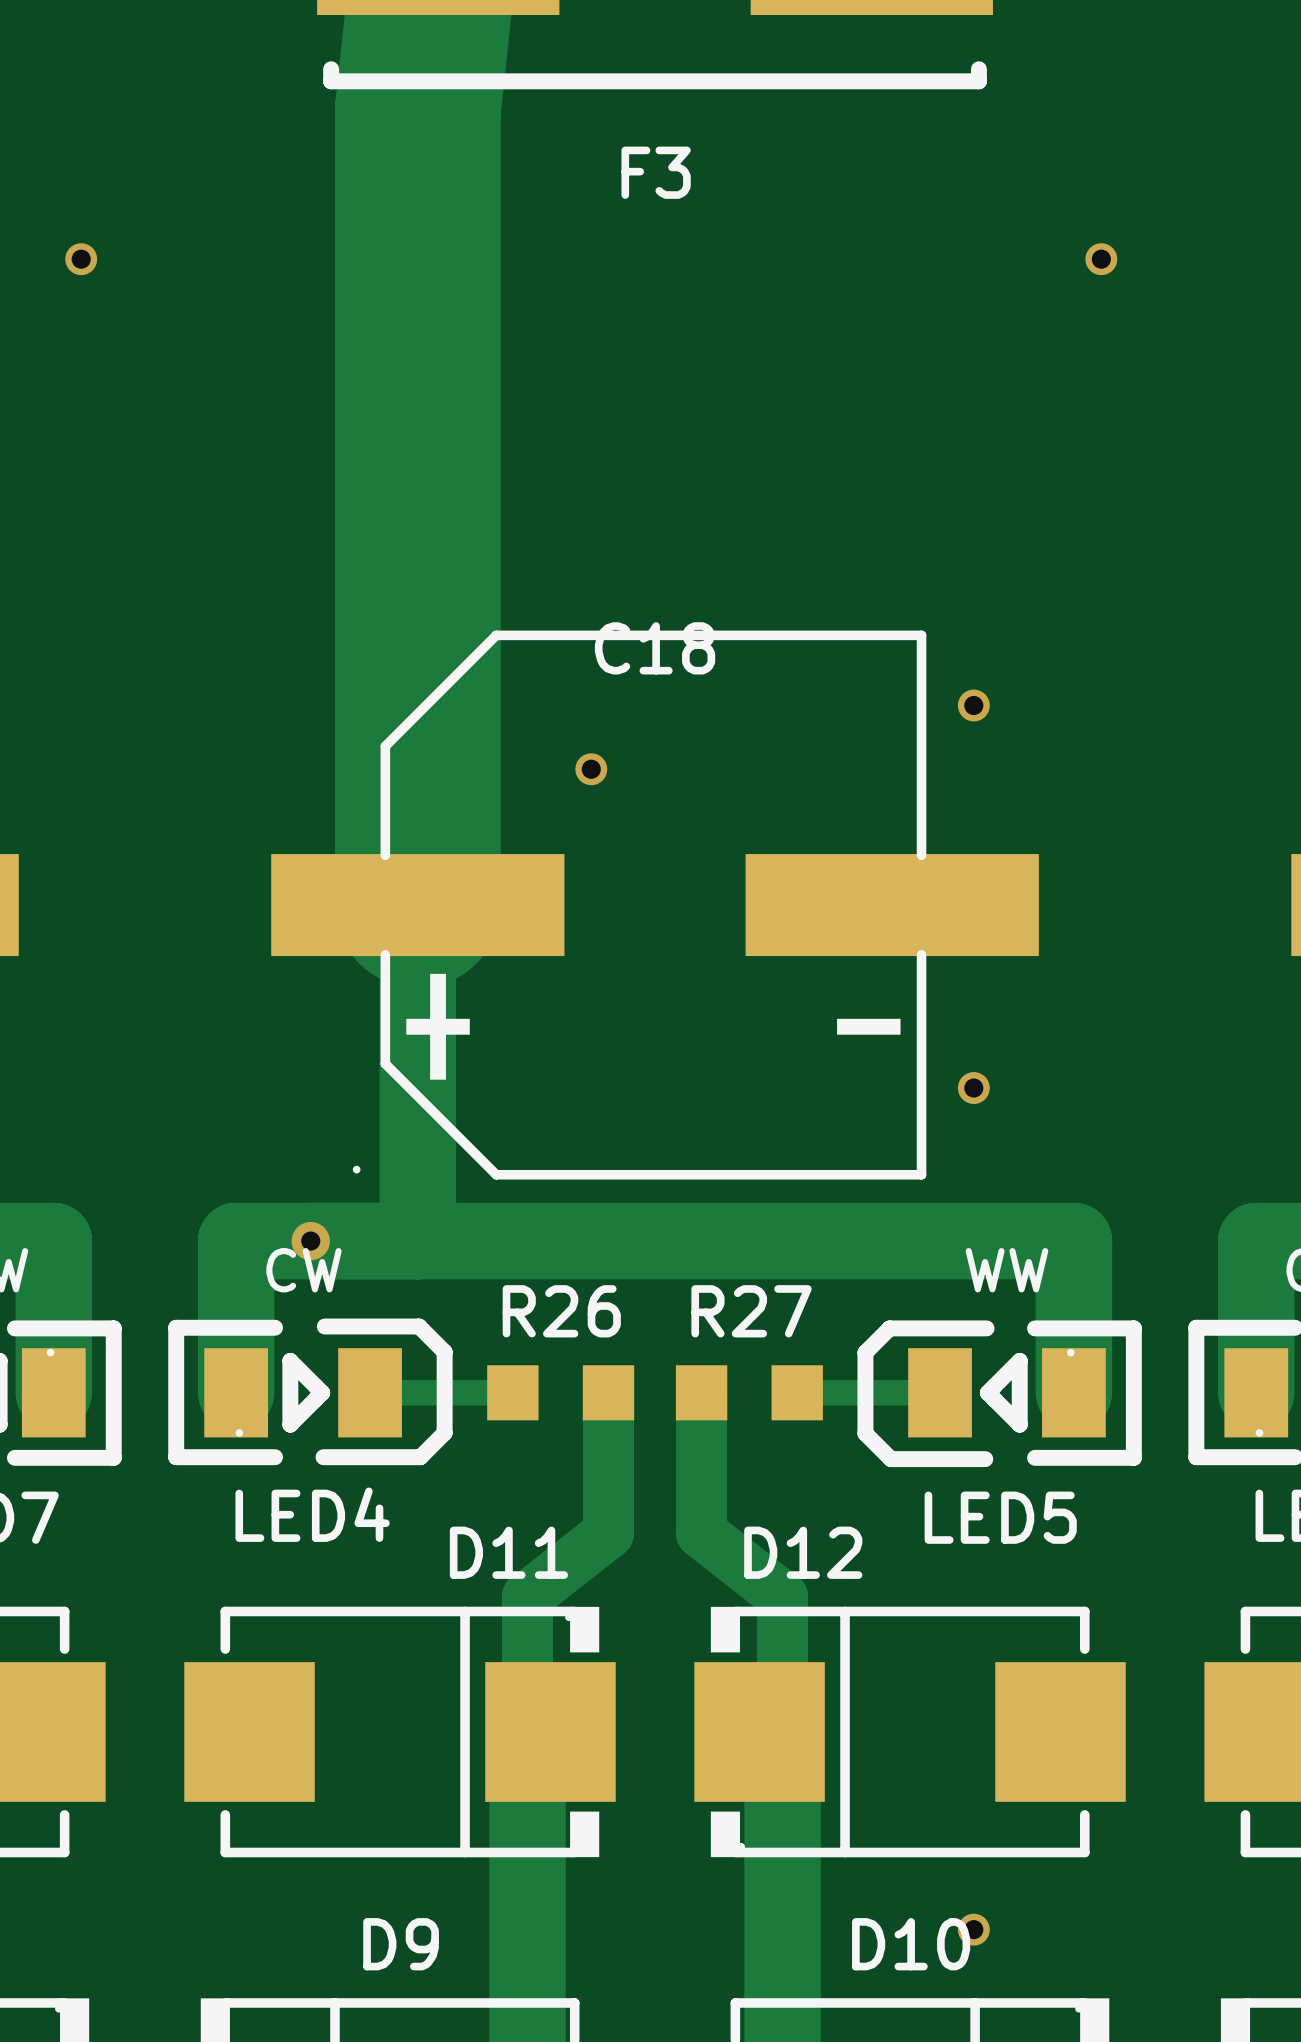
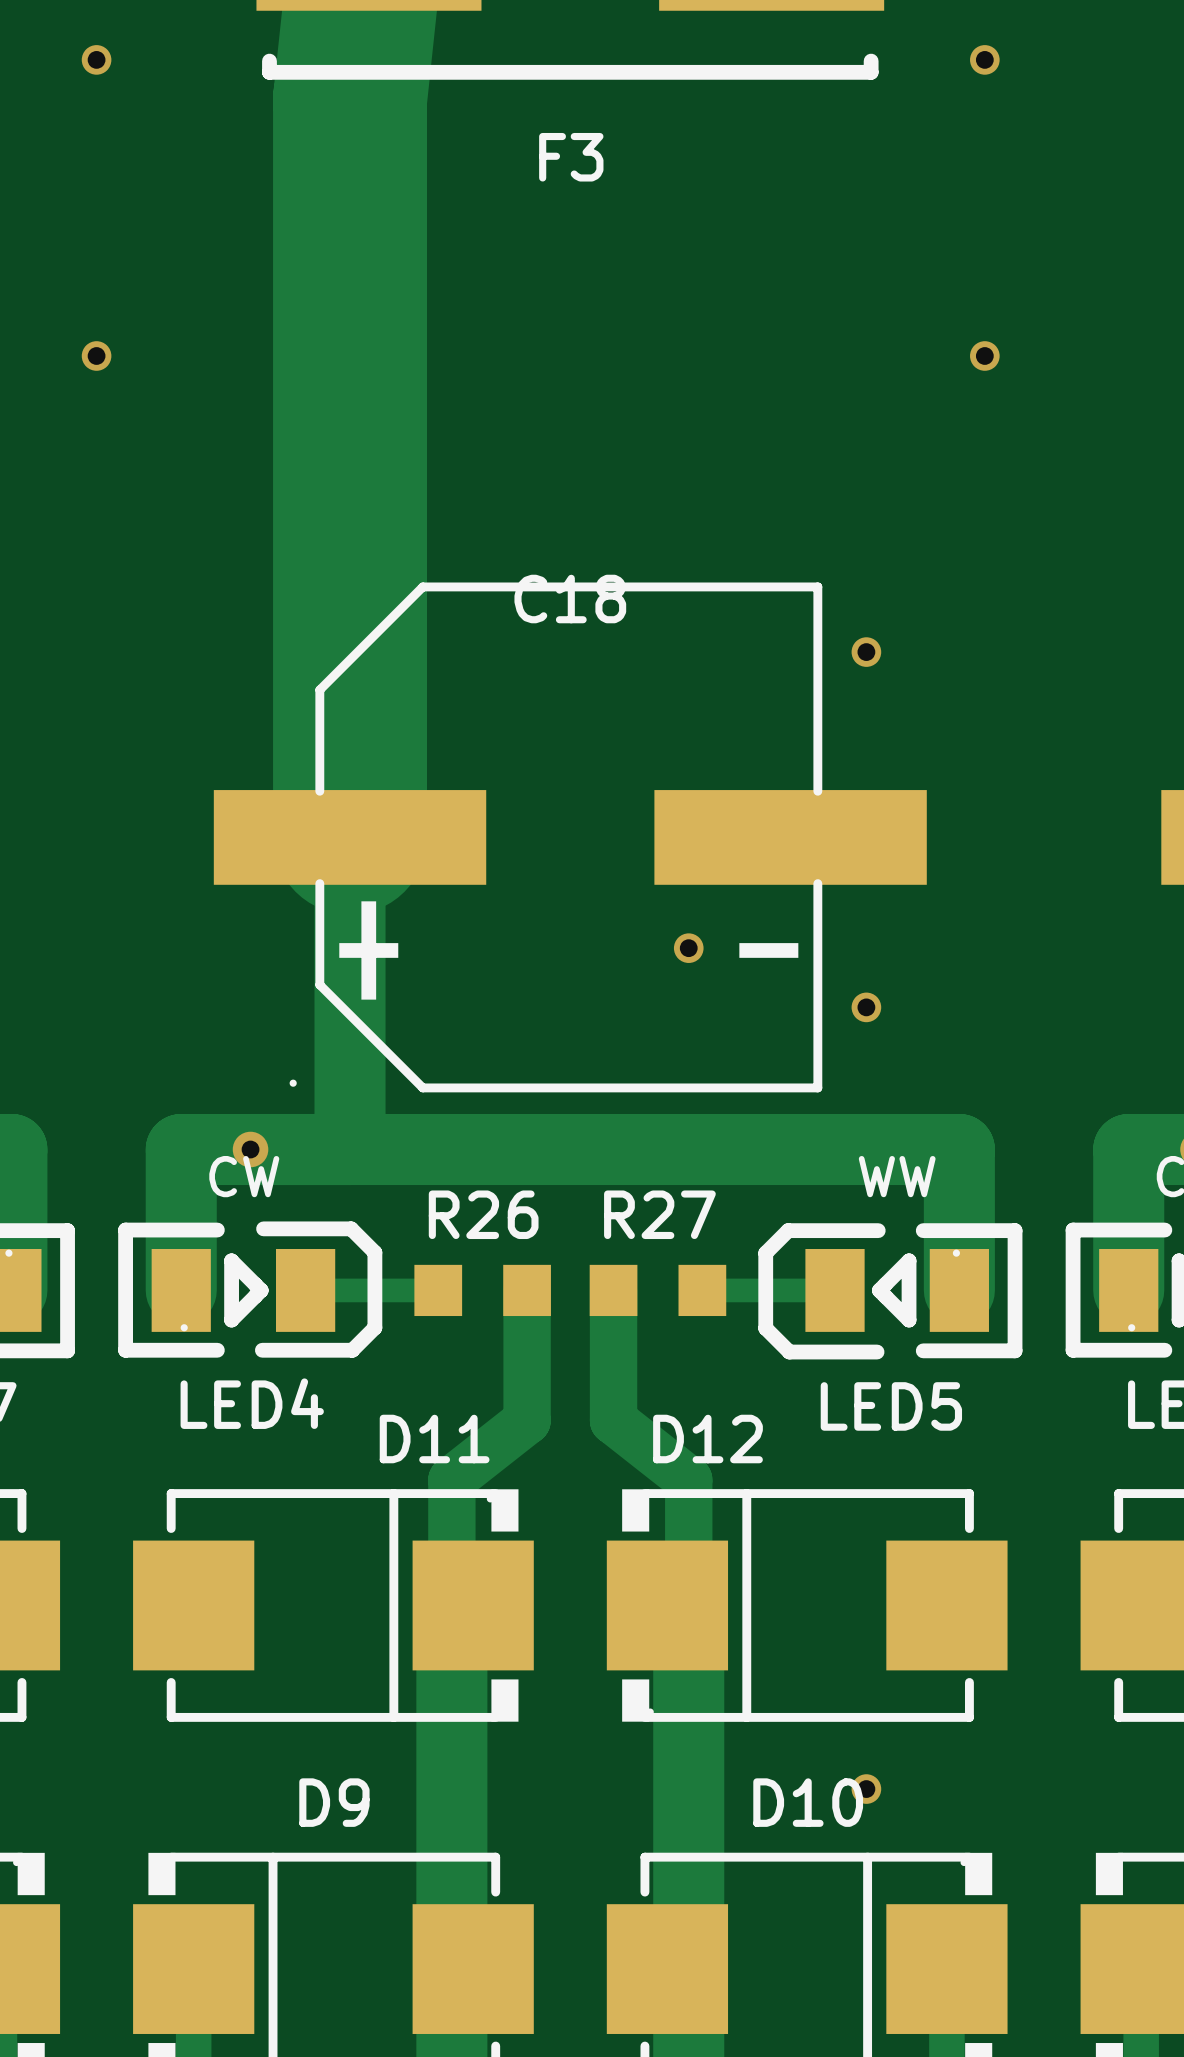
via: none -> (96, 59)
via: none -> (984, 59)
via: (81, 259) -> none
via: (1101, 259) -> none
via: none -> (96, 355)
via: none -> (984, 355)
via: (591, 769) -> none
via: none -> (688, 948)

